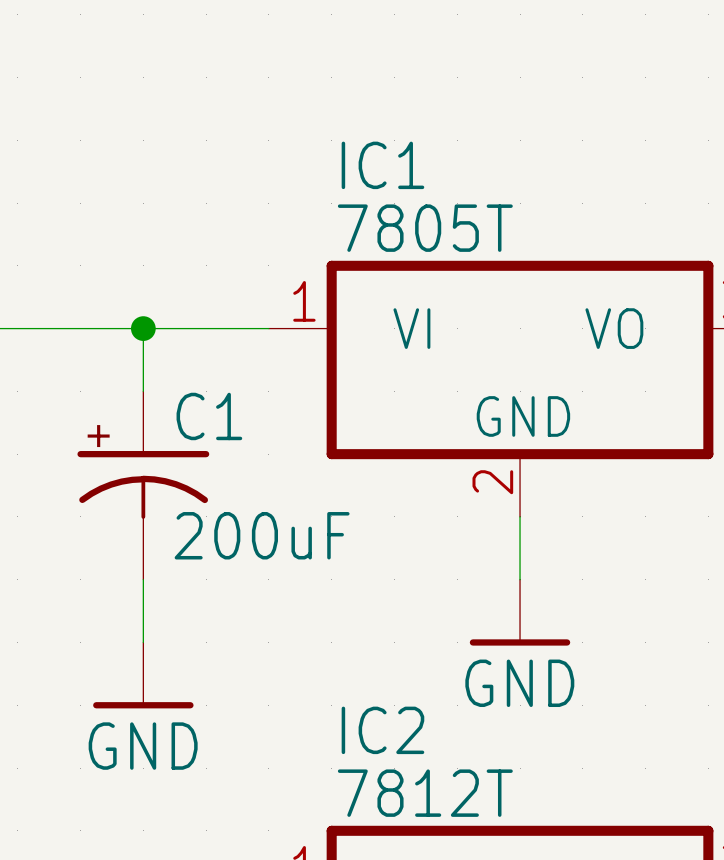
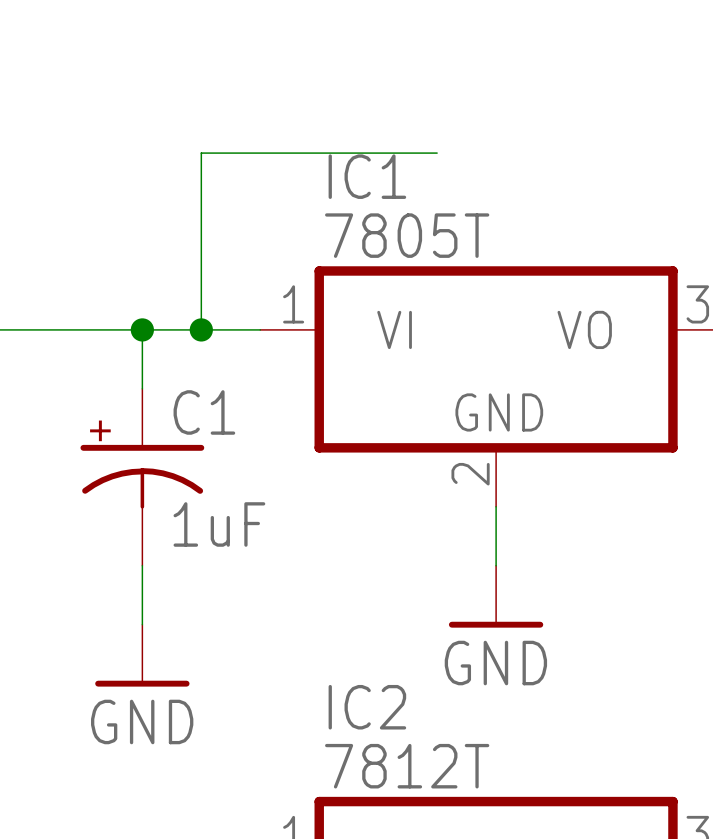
wire: none -> (437, 153) (201, 153) (201, 329)
junction: none -> (201, 329)
C1 value: 200uF (262, 535) -> 1uF (219, 524)

